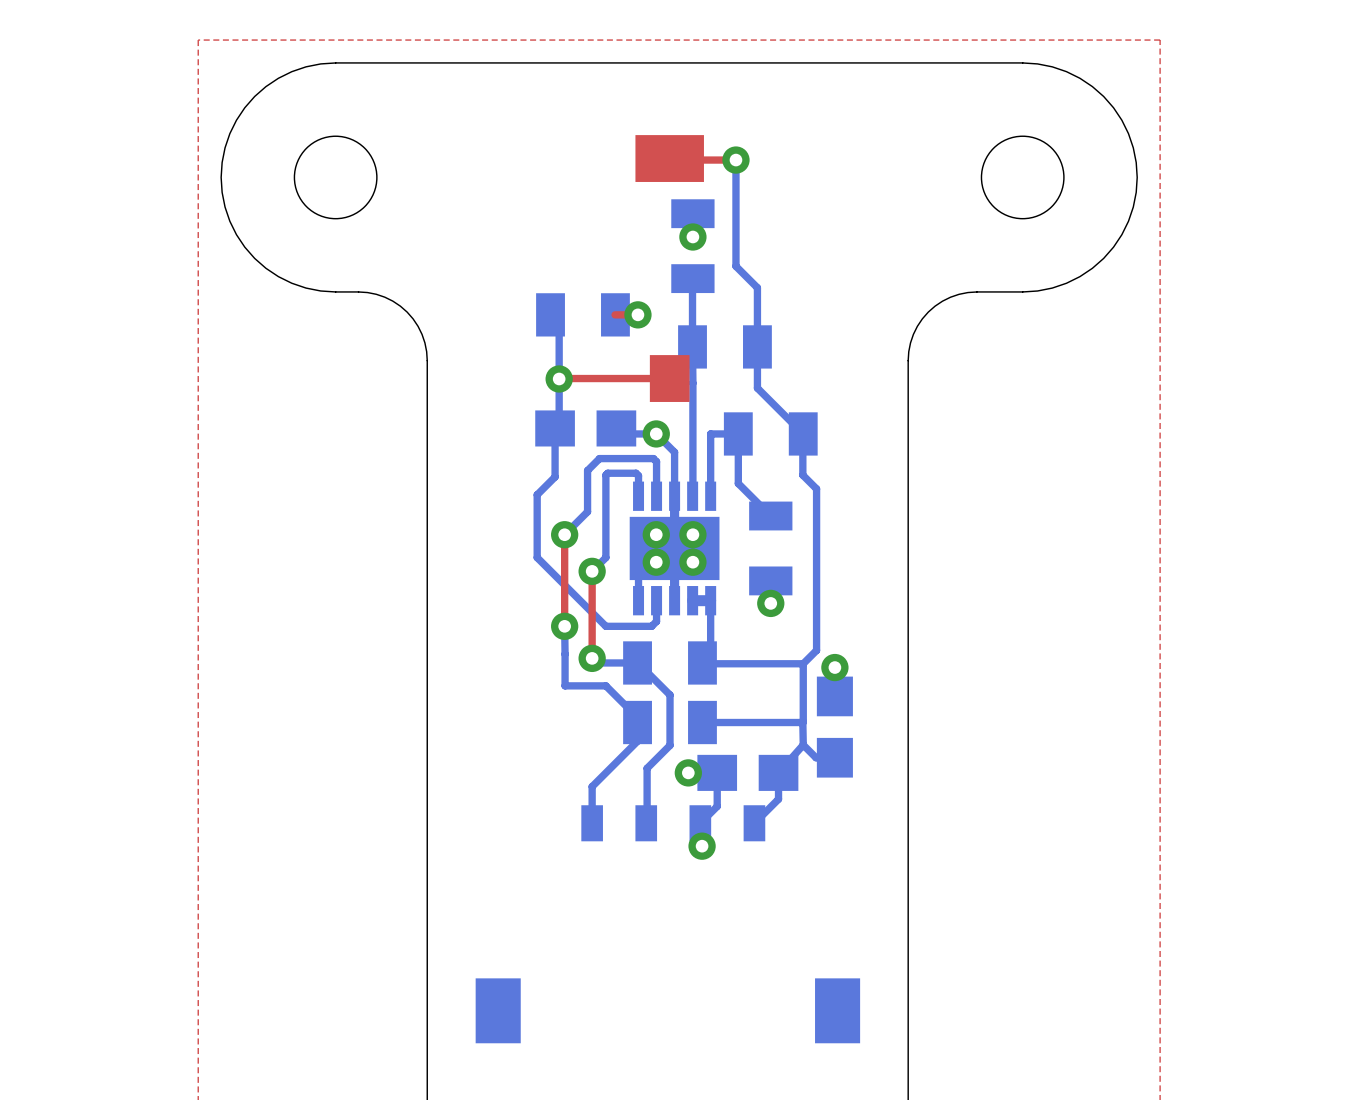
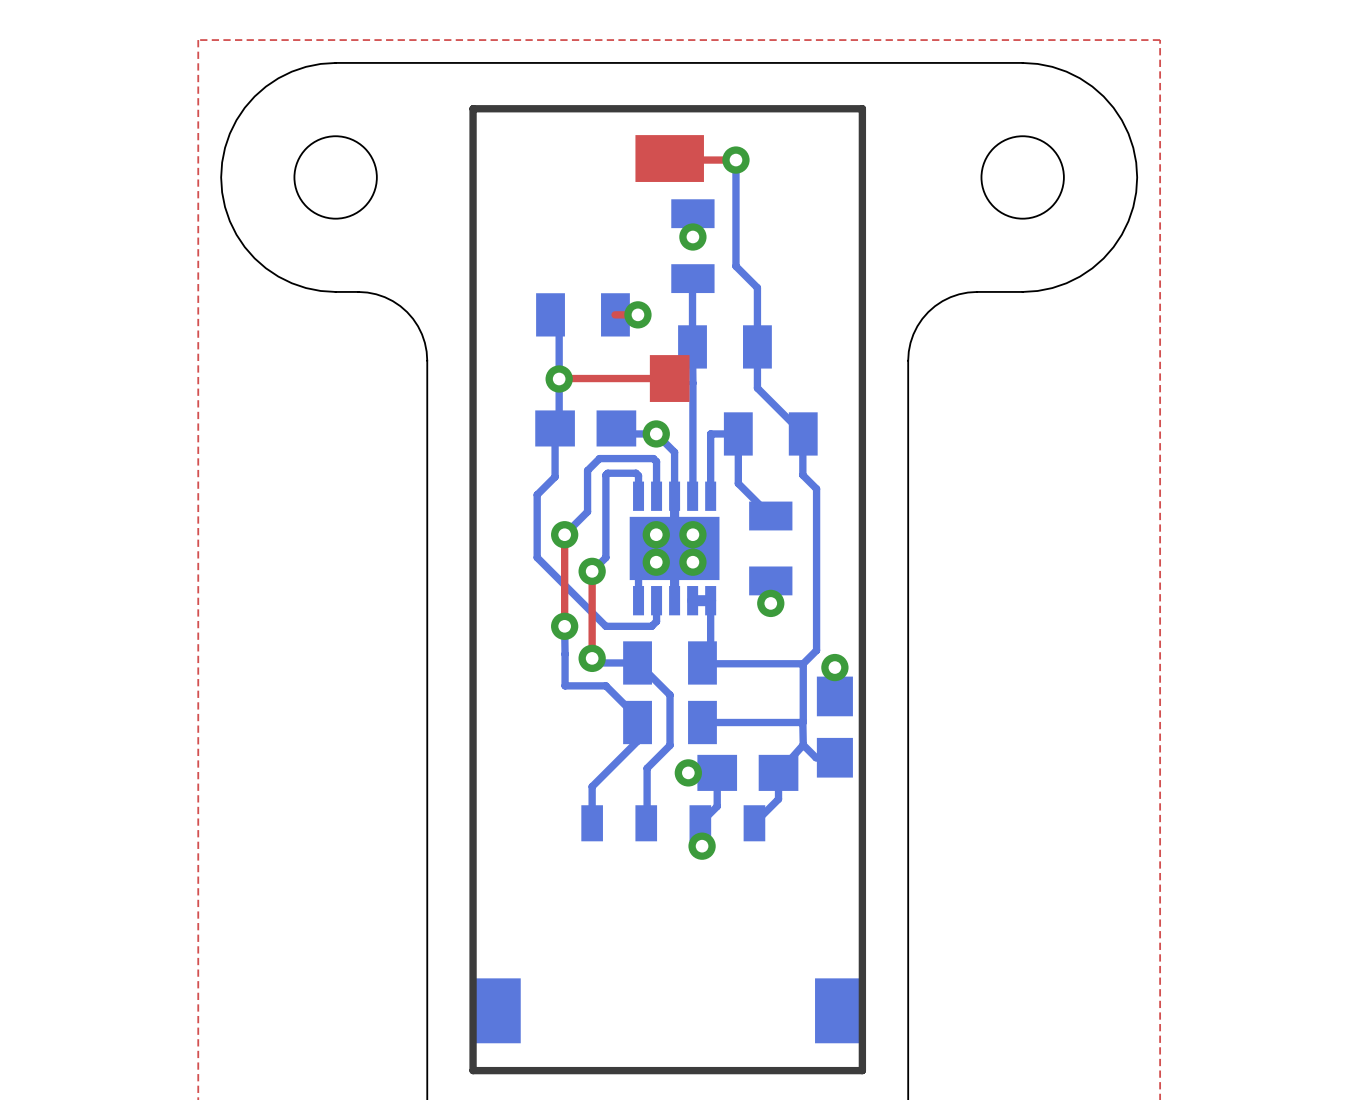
line: none -> (473, 108) (473, 1070) (862, 1070) (862, 108) (473, 108)

